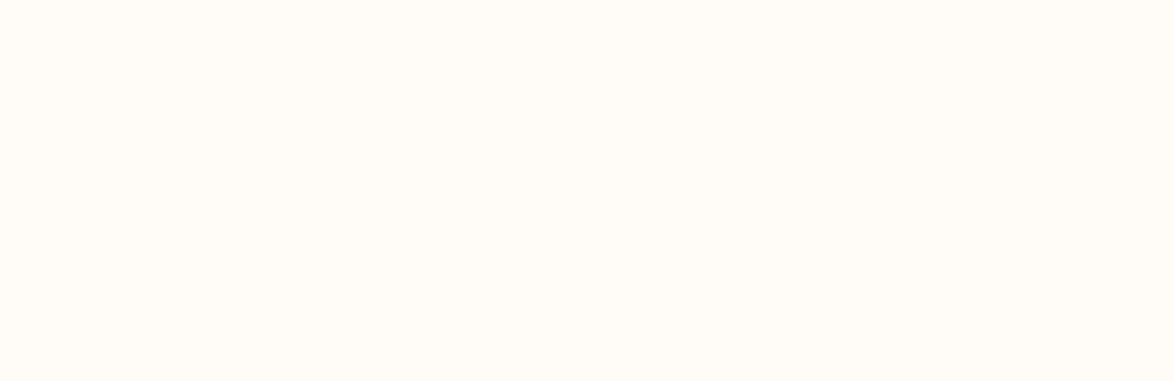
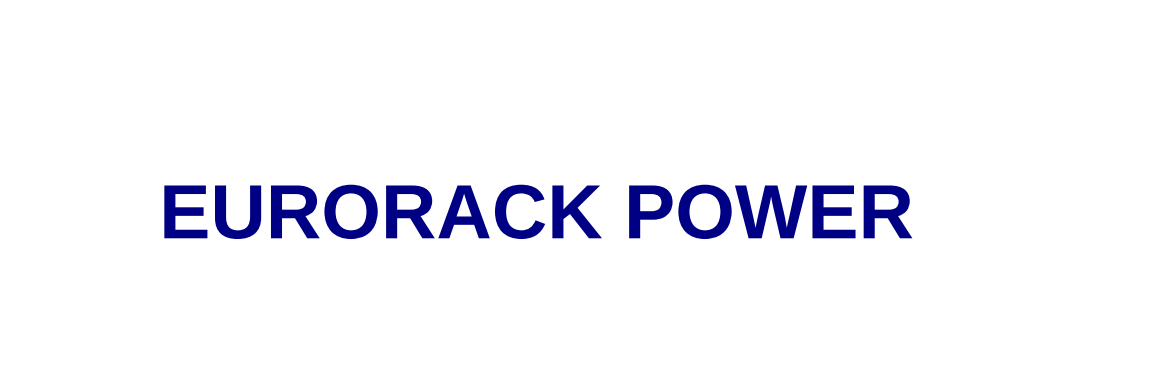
text: none -> EURORACK POWER (538, 211)

